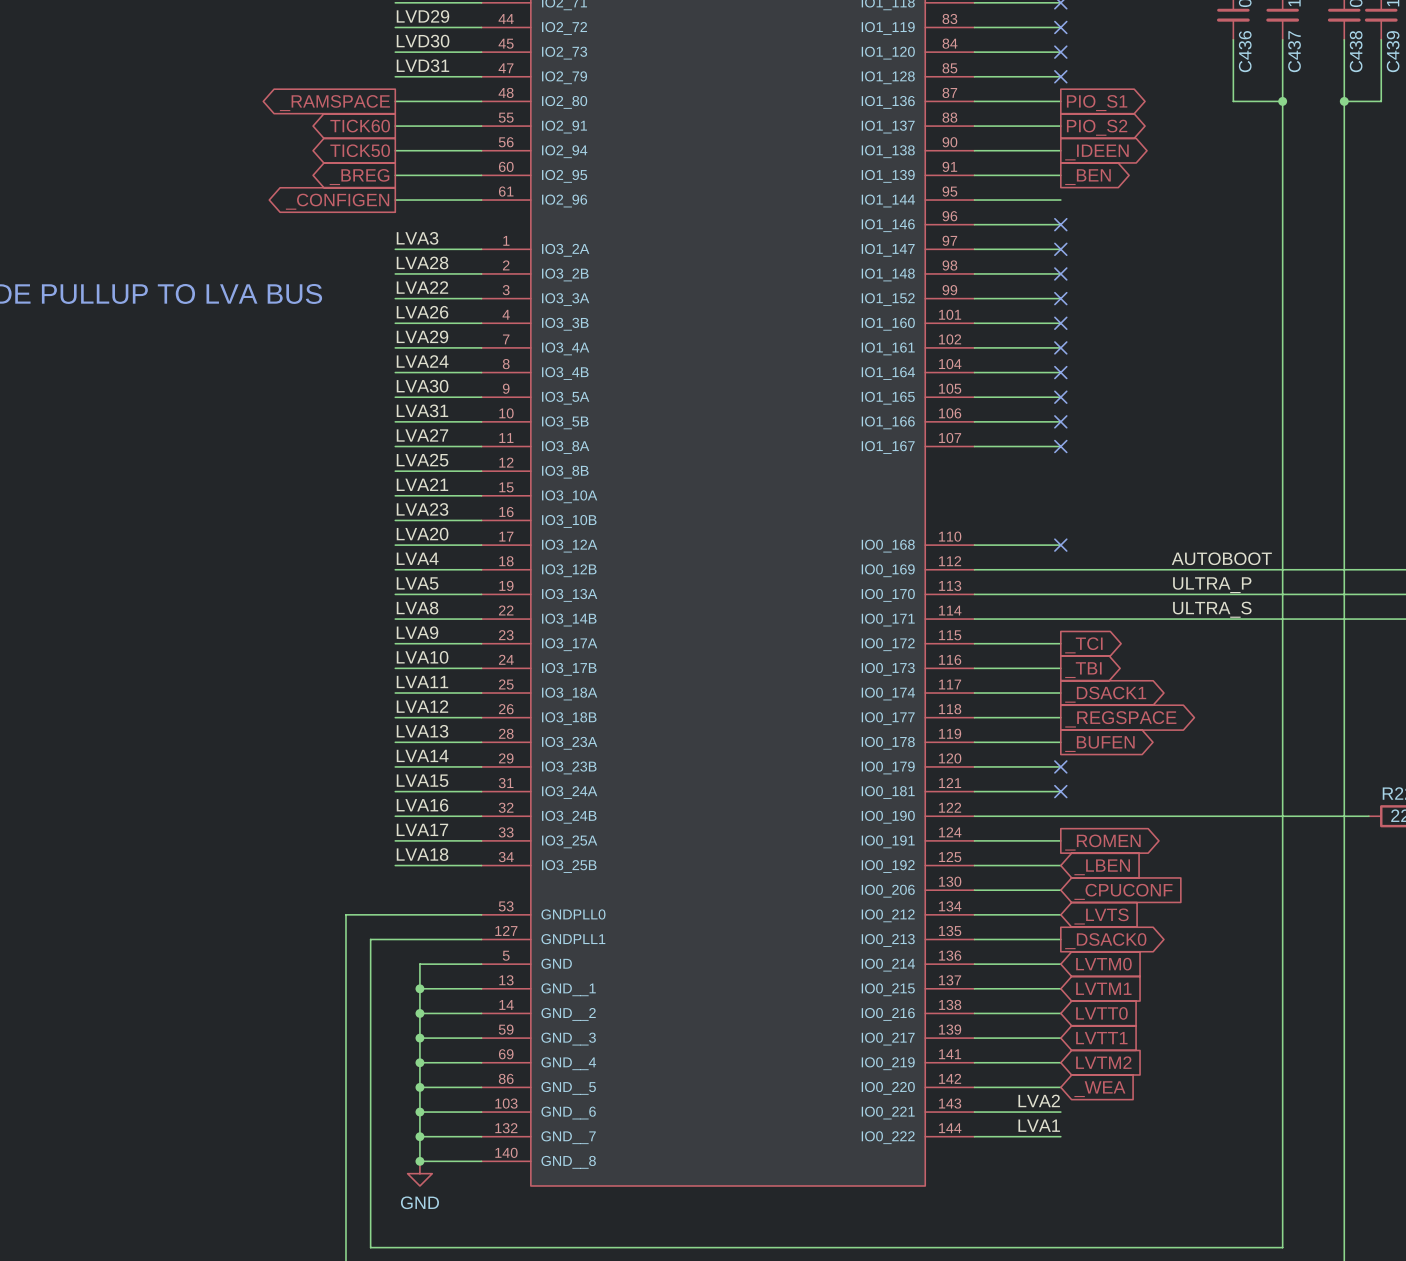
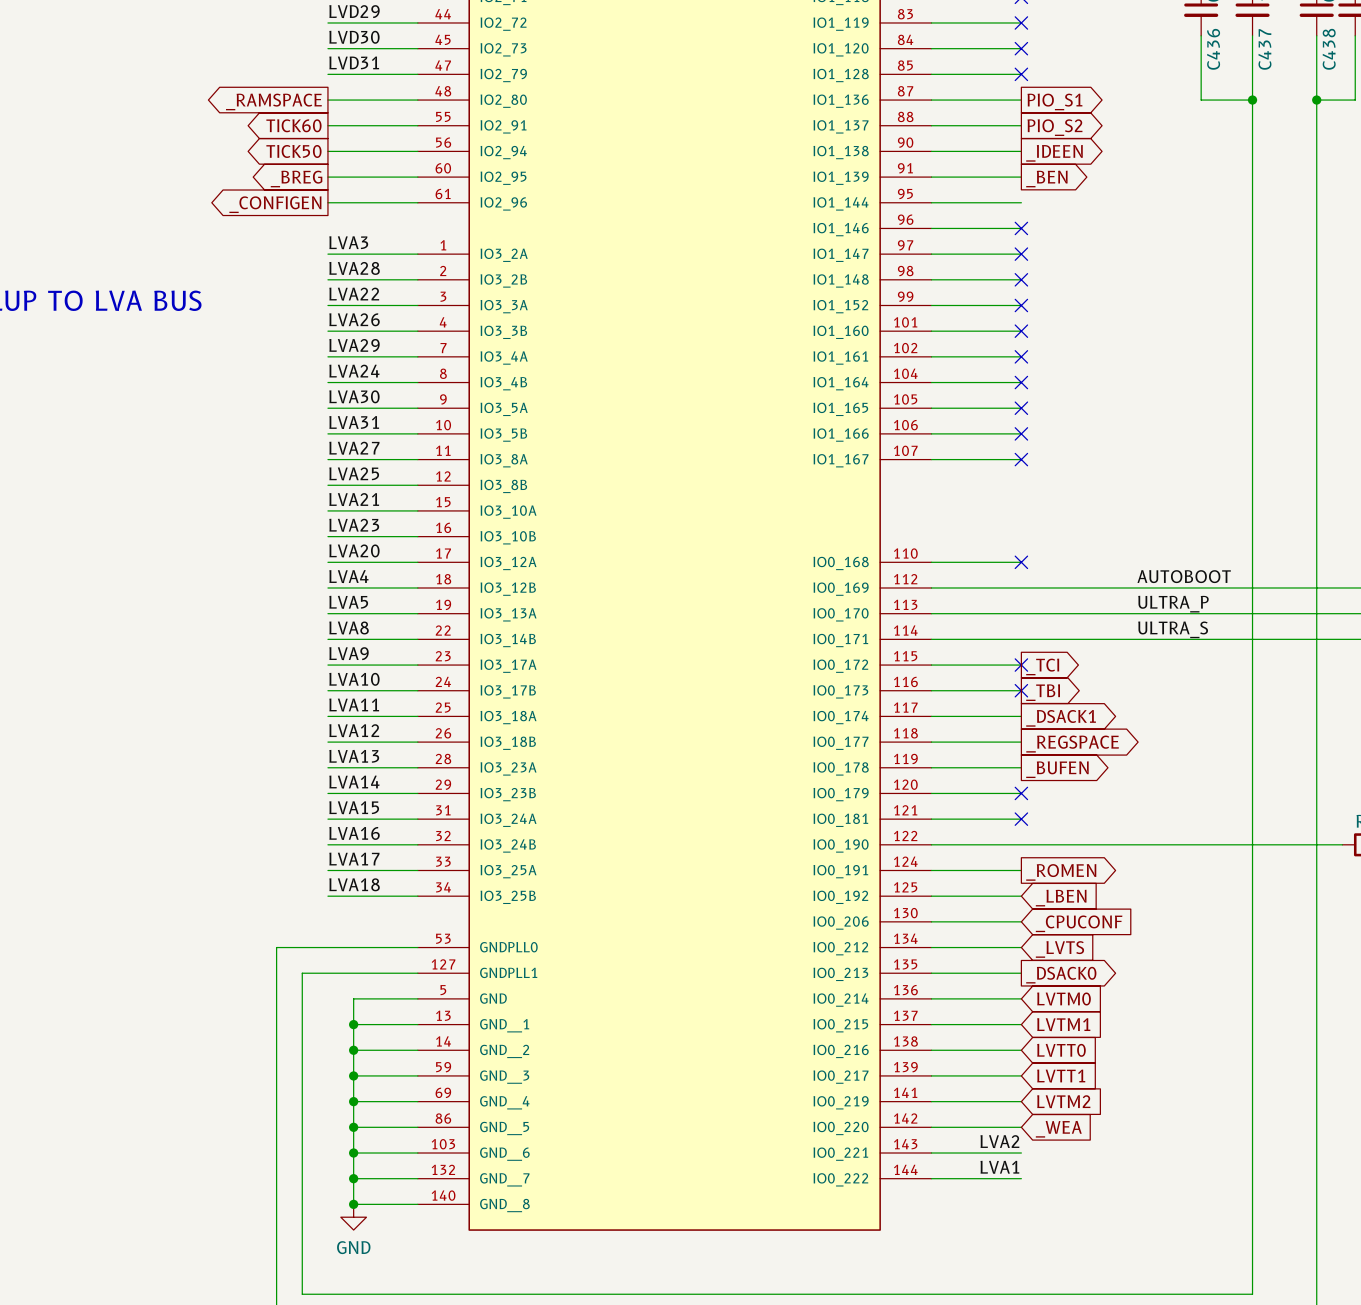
no-connect mark: none -> (1021, 665)
no-connect mark: none -> (1021, 690)

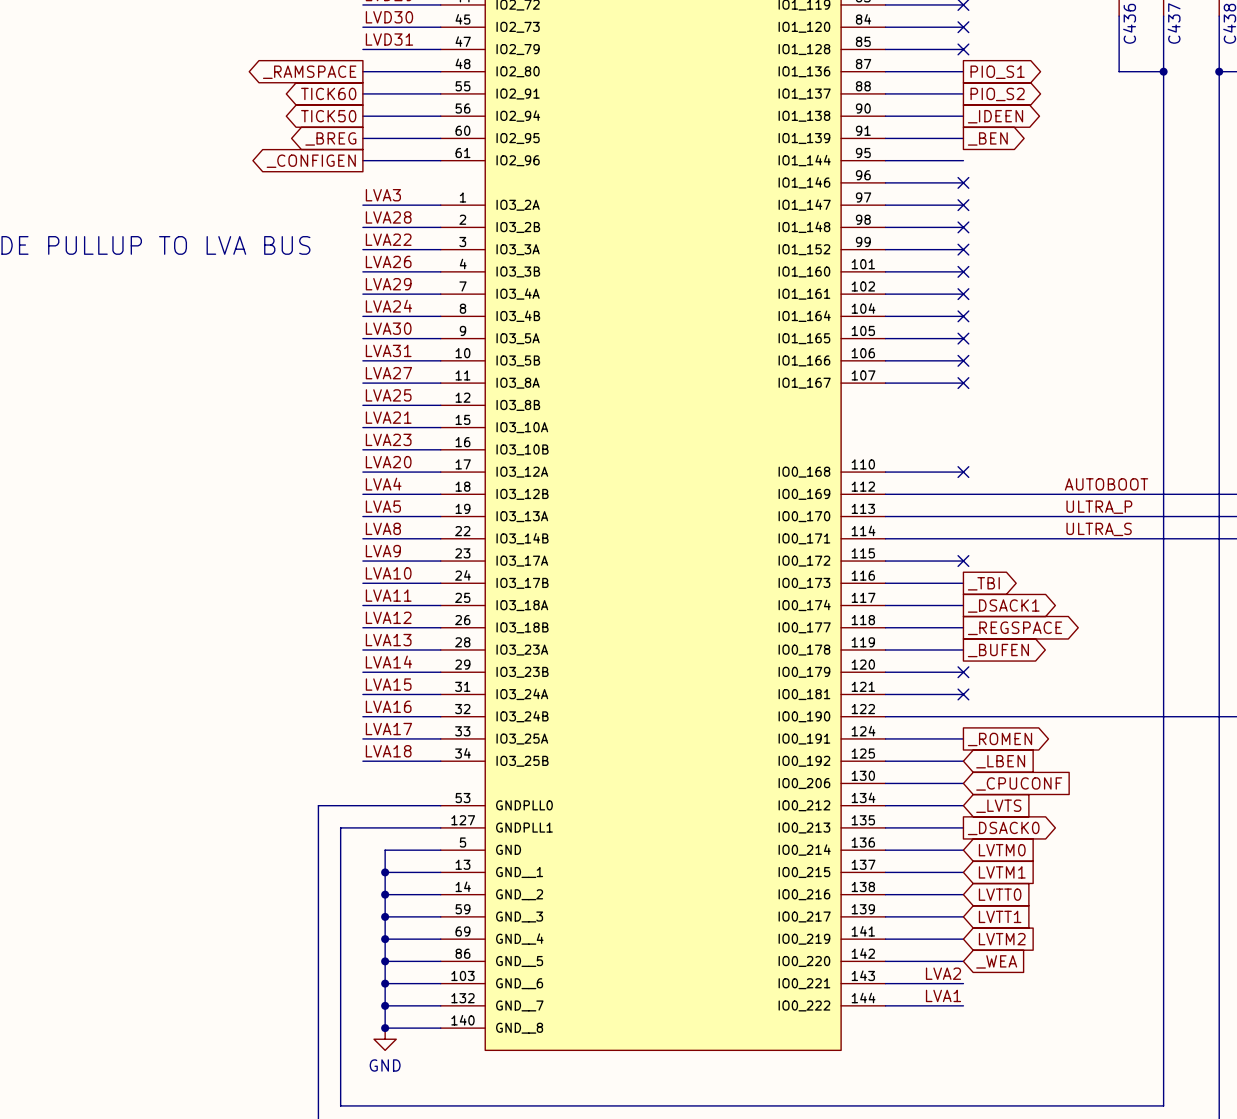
global label: _TCI (1042, 666) -> none
no-connect mark: (1021, 690) -> none

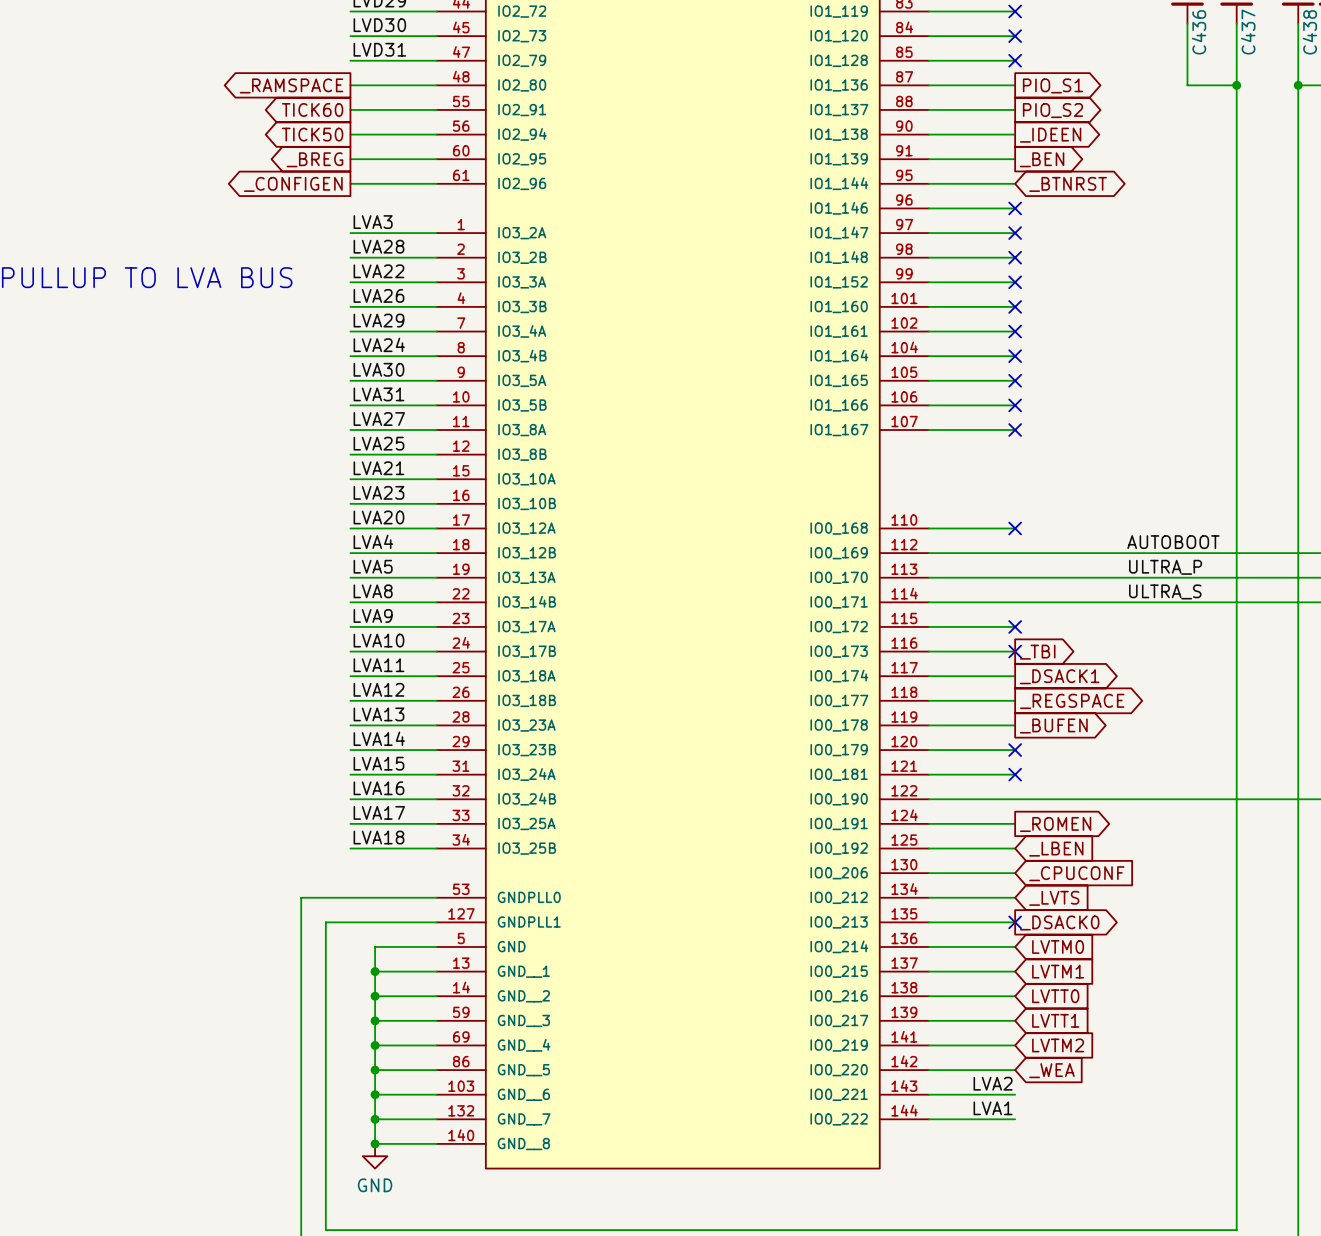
global label: none -> _BTNRST (1068, 184)
no-connect mark: none -> (1015, 651)
no-connect mark: none -> (1015, 922)

